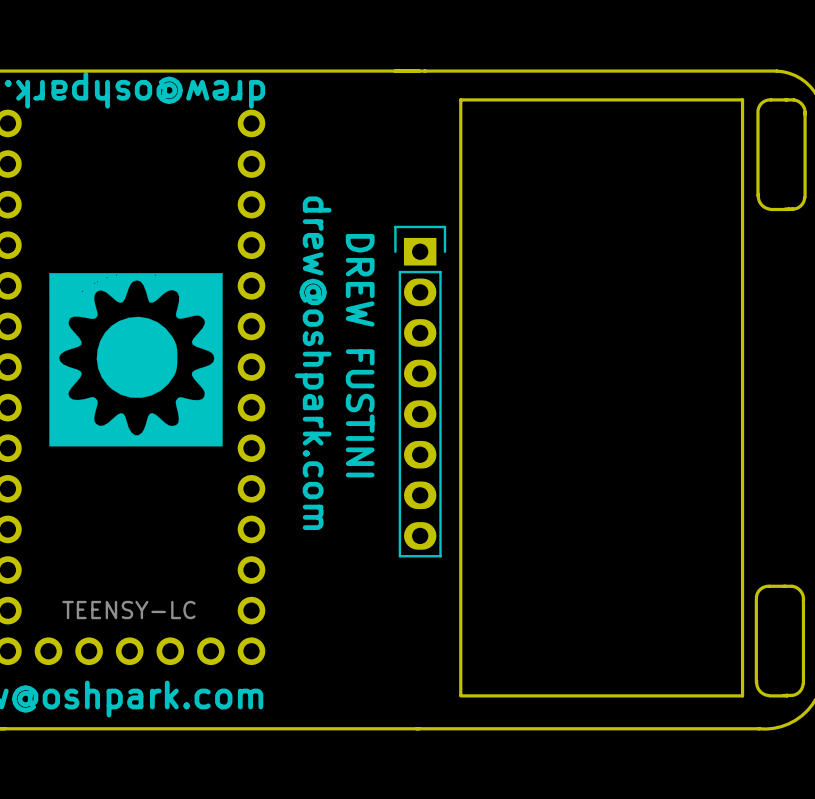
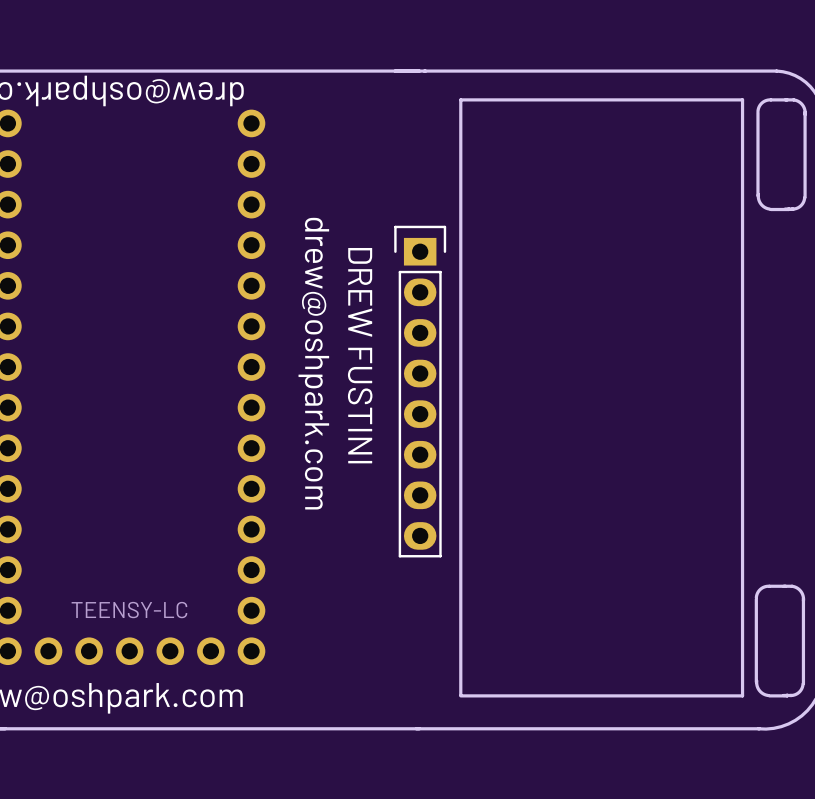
drawing: [49, 273, 223, 447] -> none

